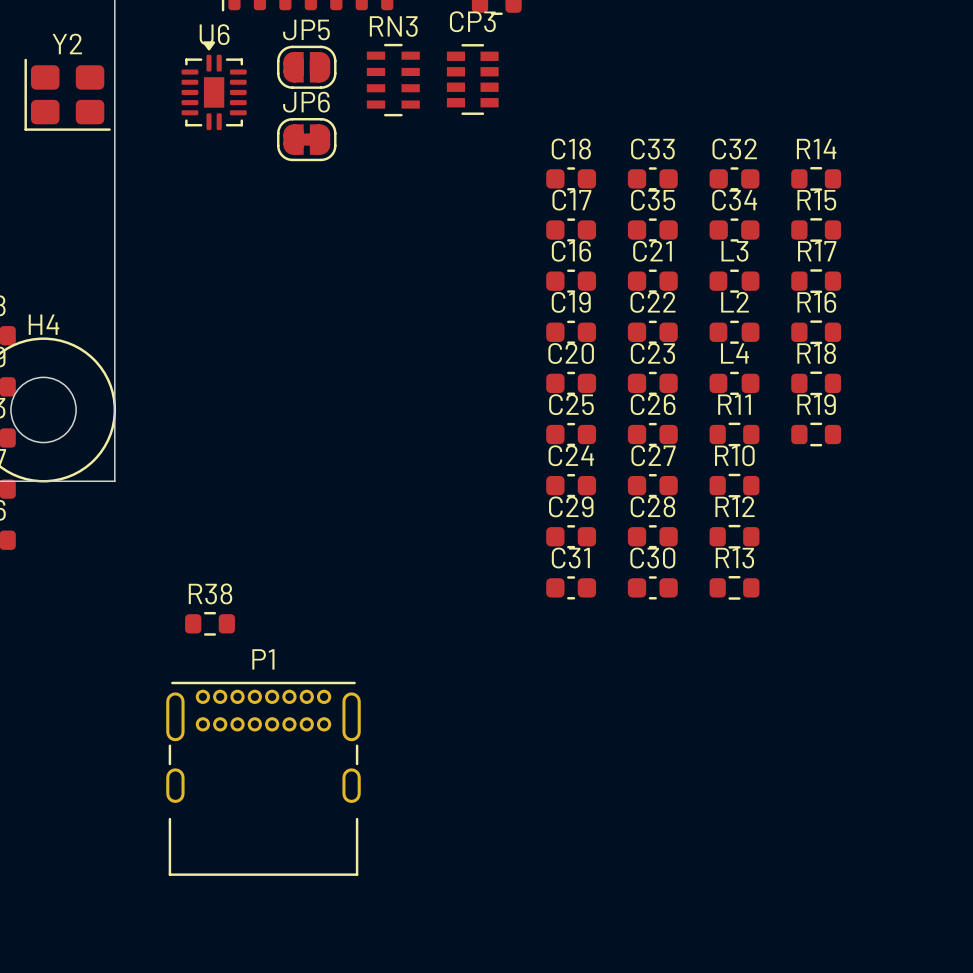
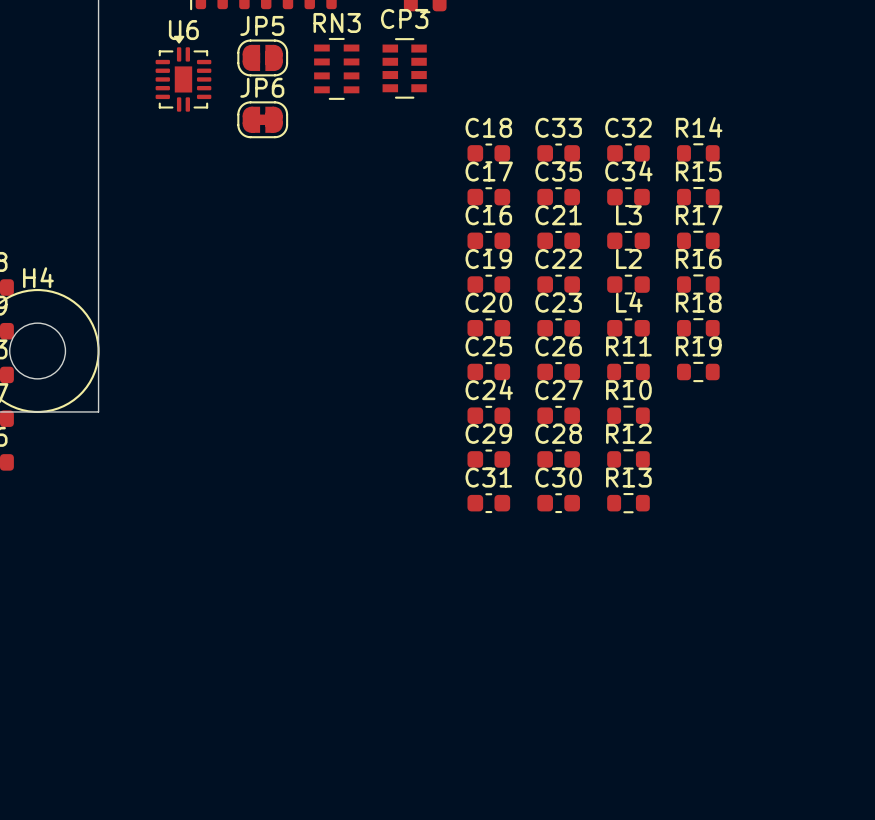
Y2: (67, 94) -> none
R38: (210, 623) -> none
P1: (263, 778) -> none

